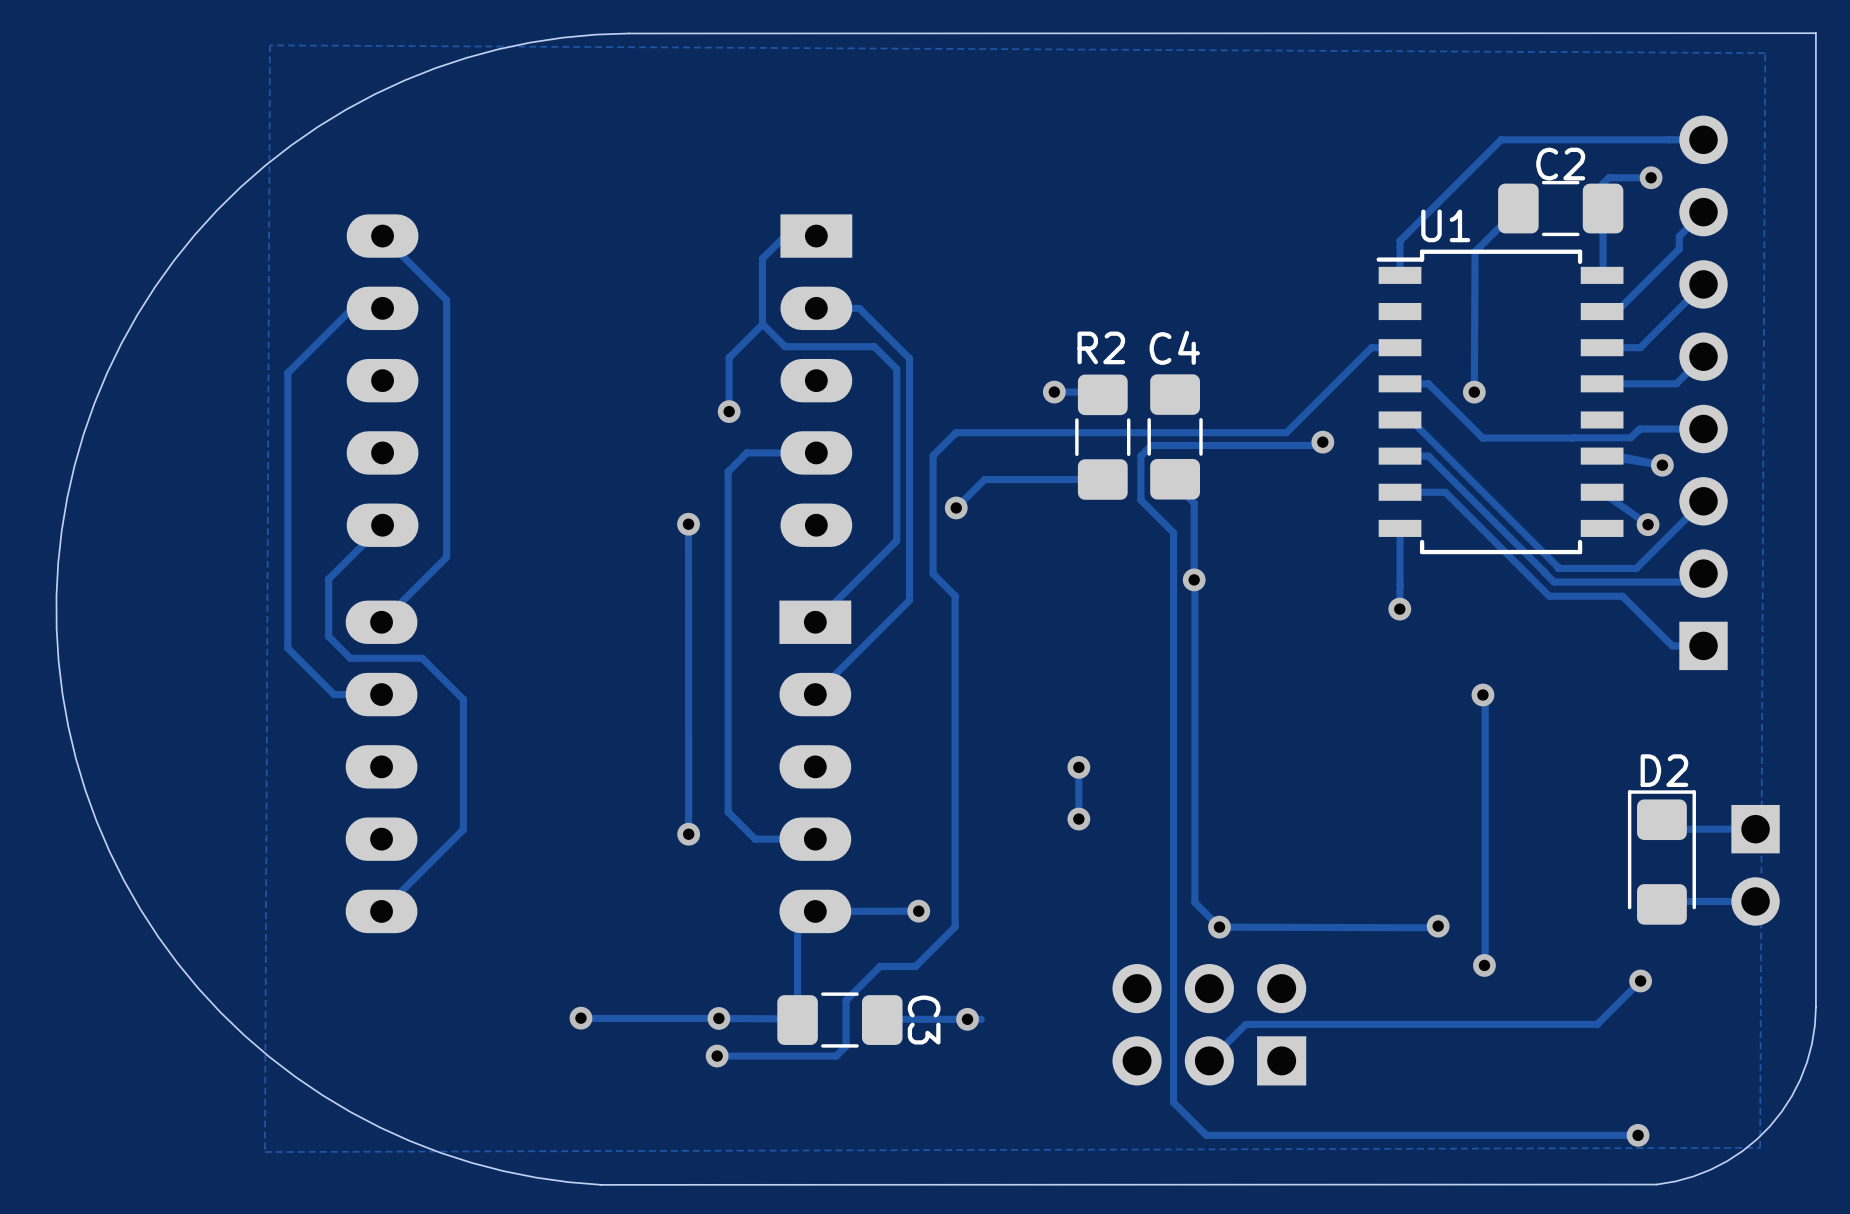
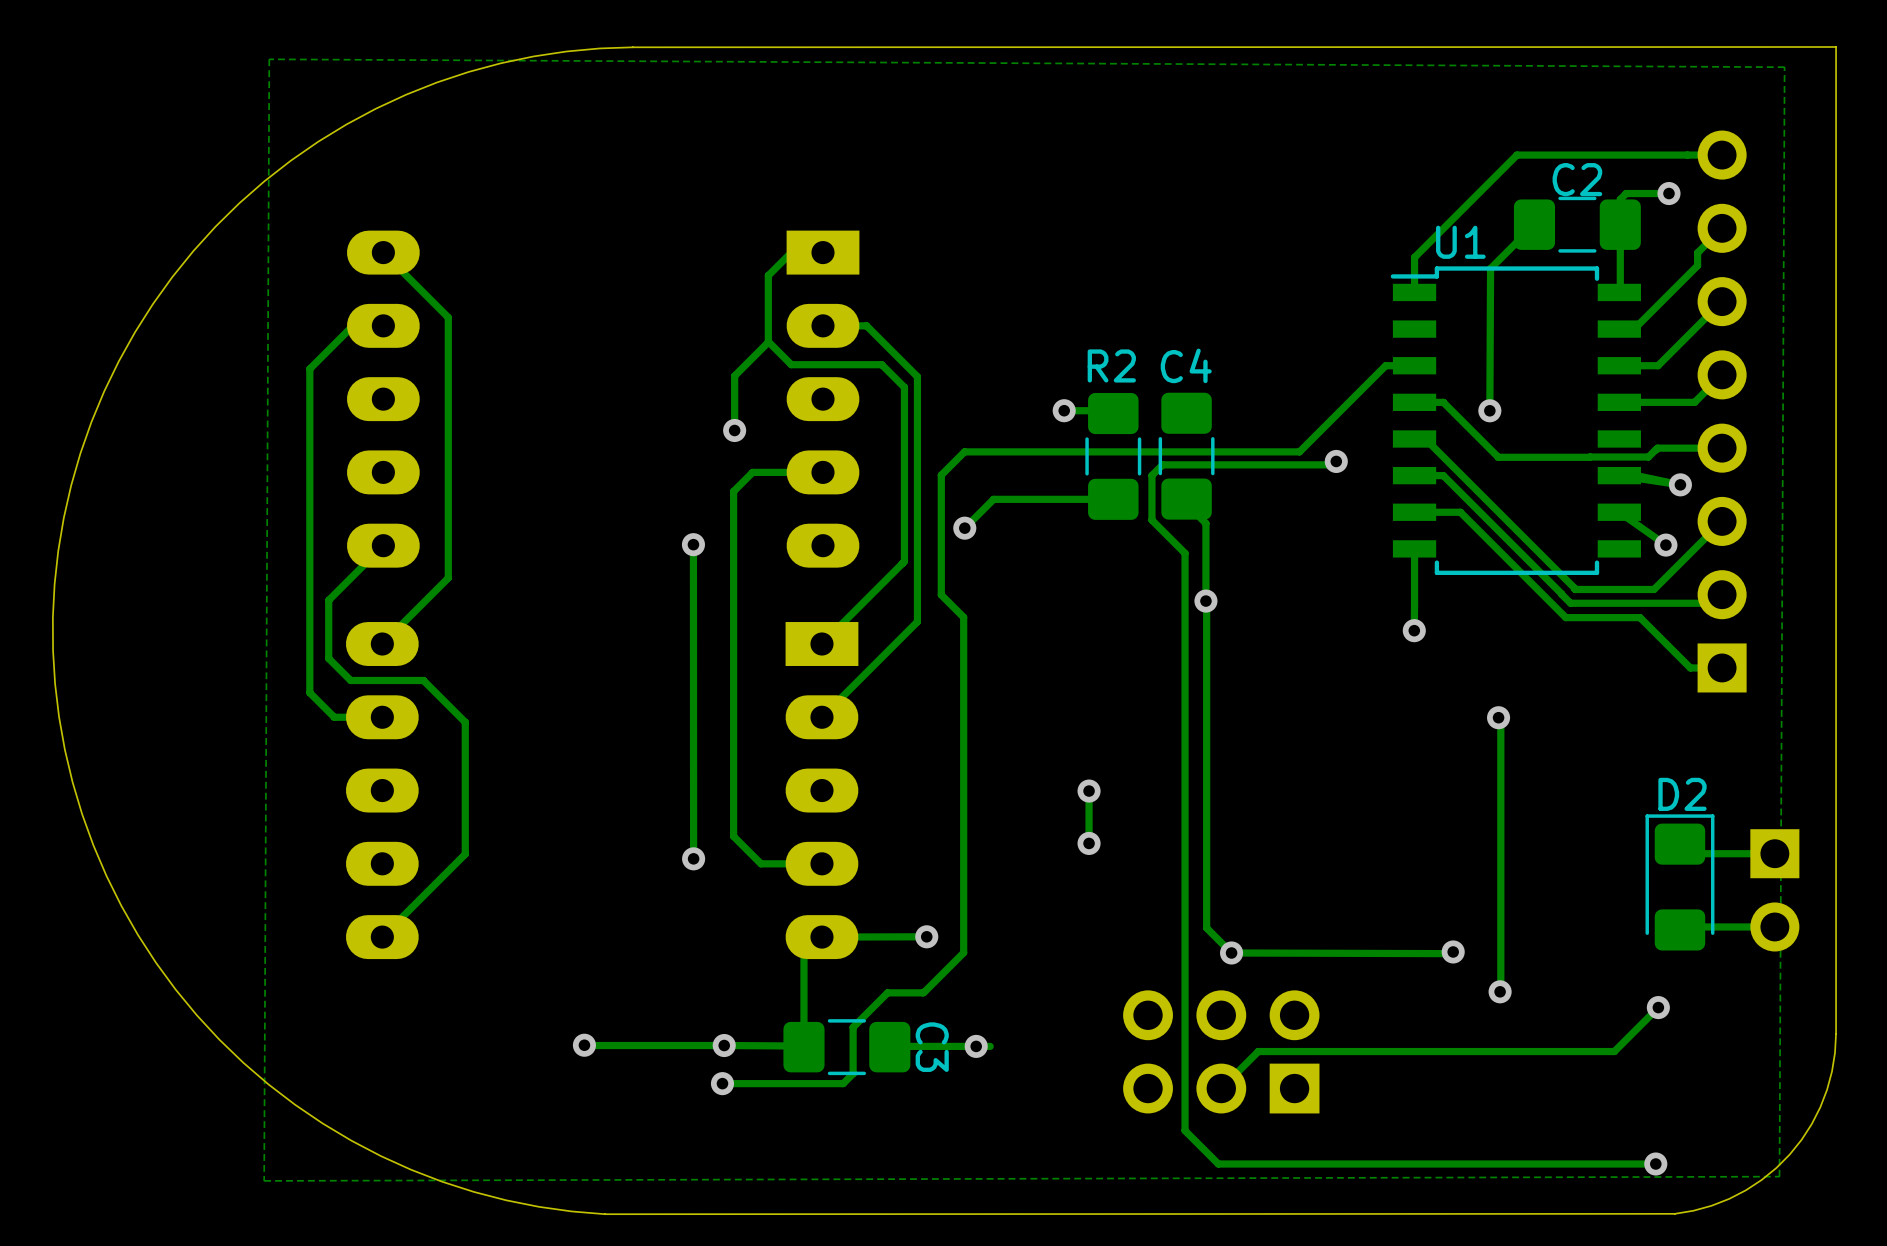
track: (309, 350) (287, 372) (287, 648) (309, 670) -> (309, 368) (309, 692)

